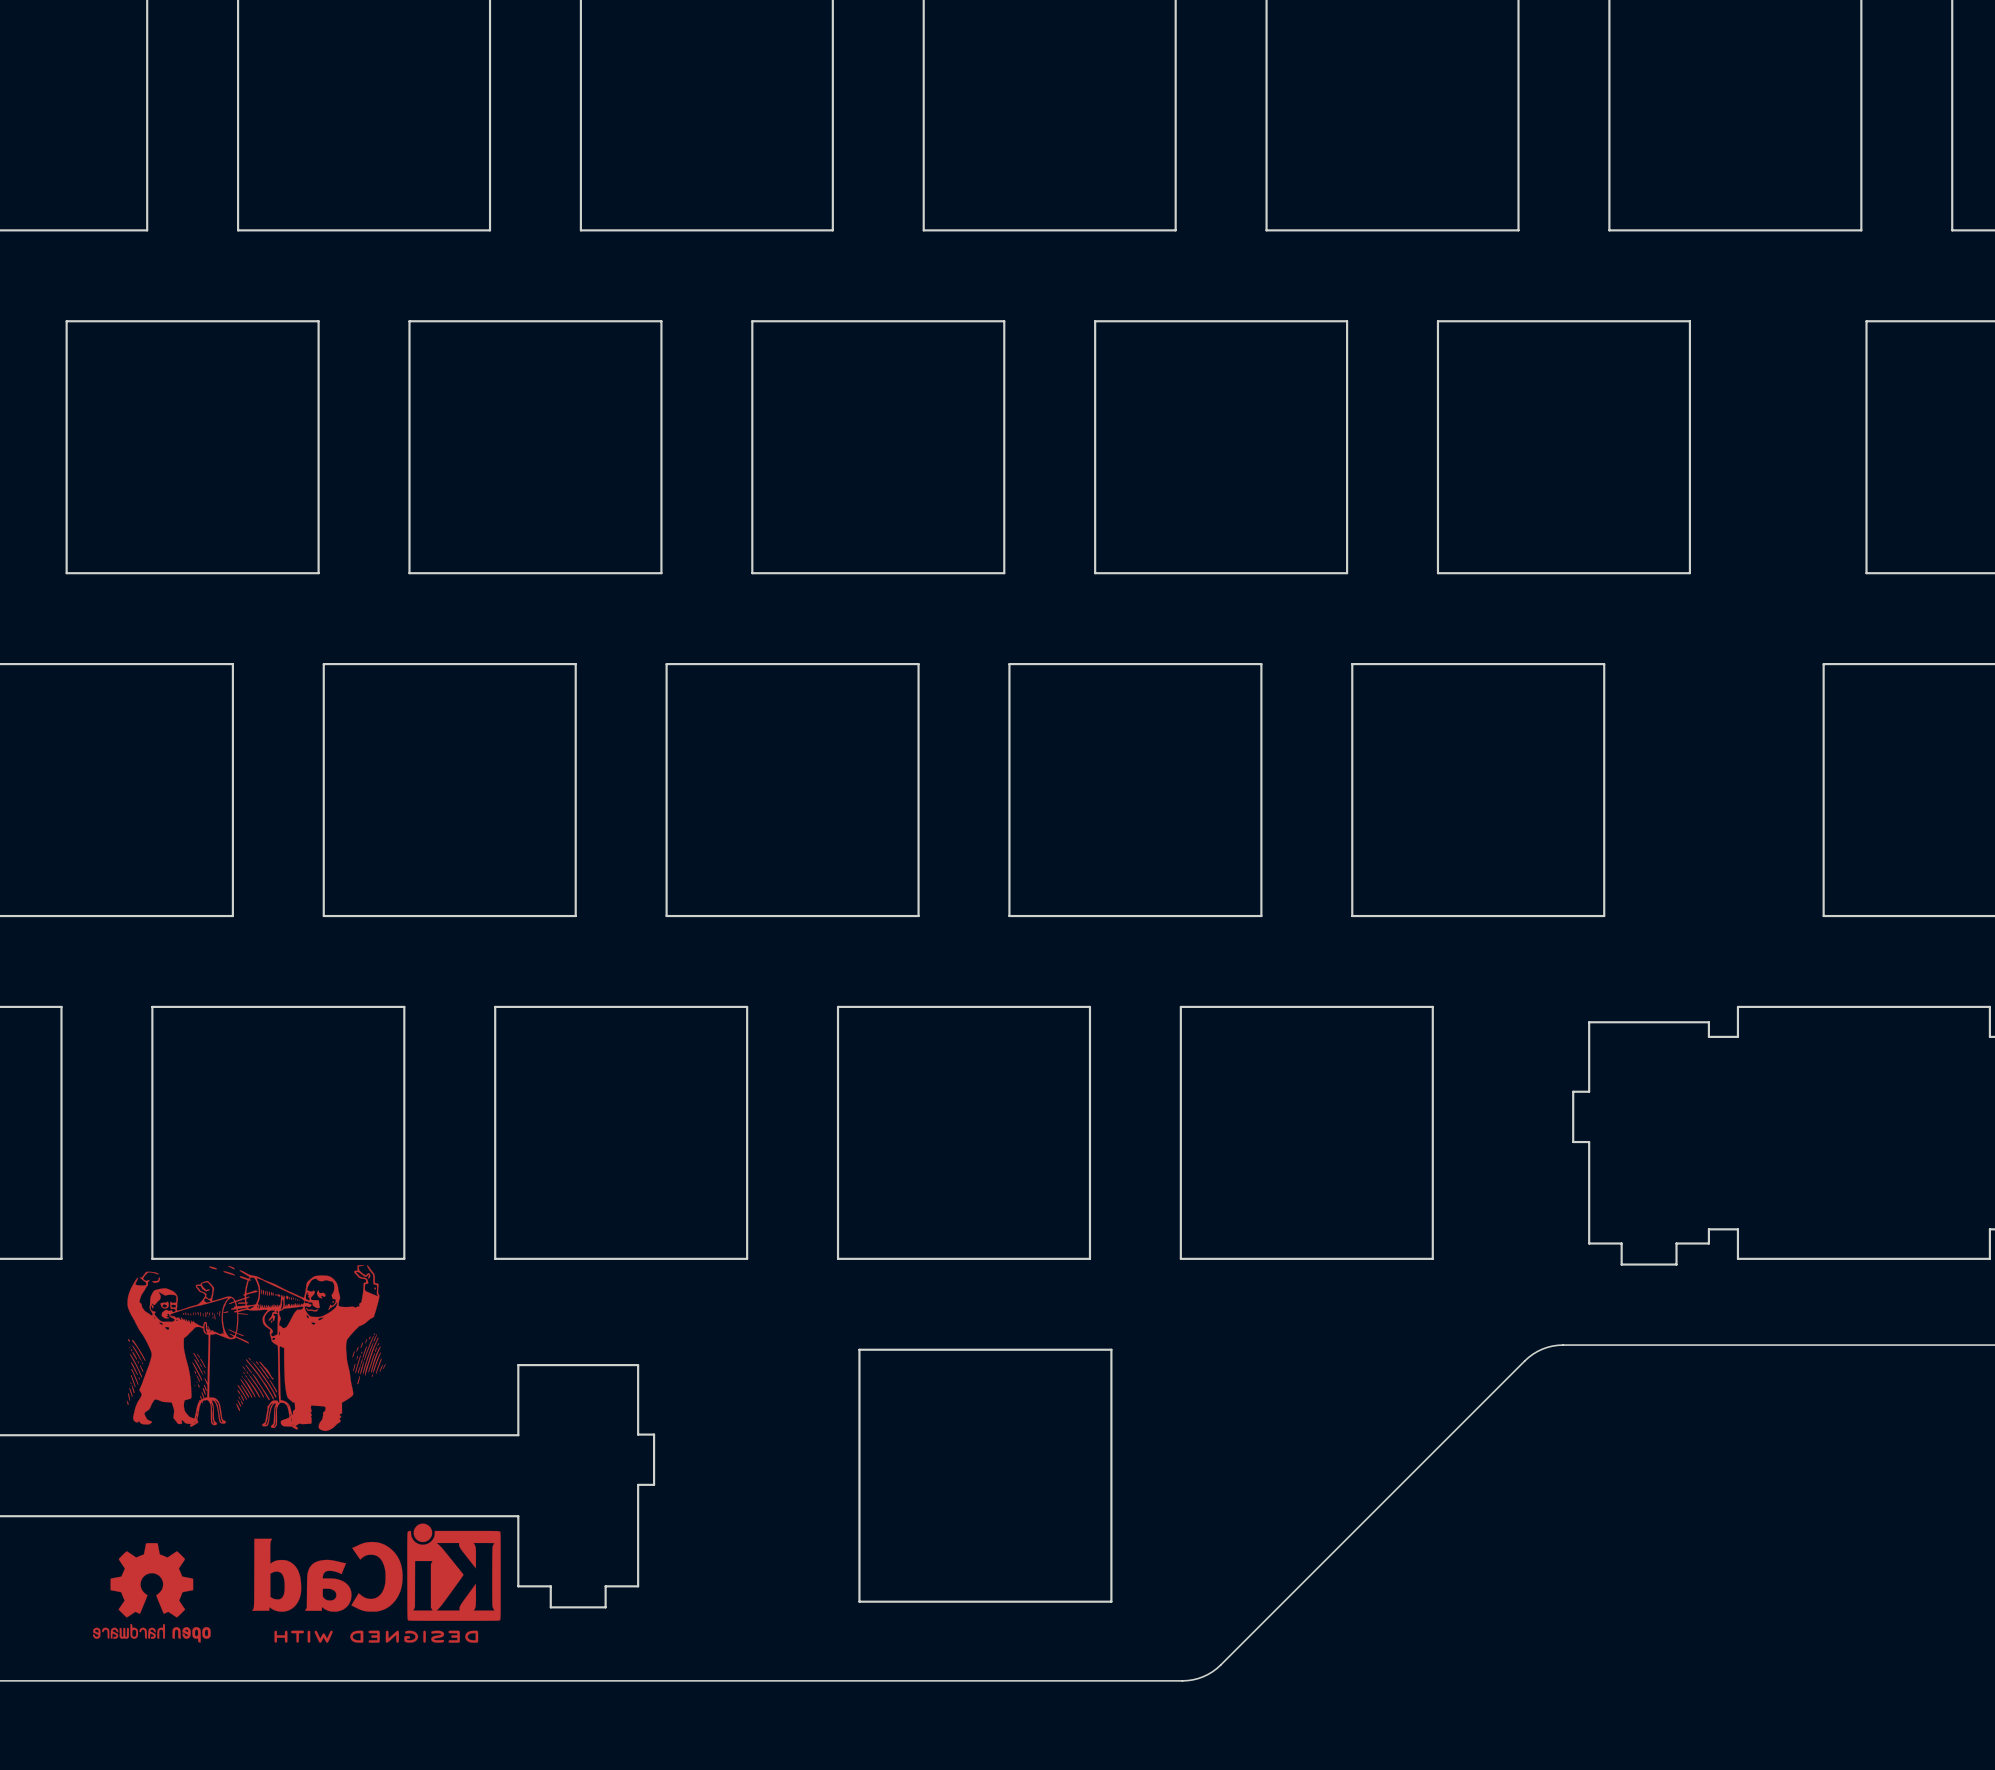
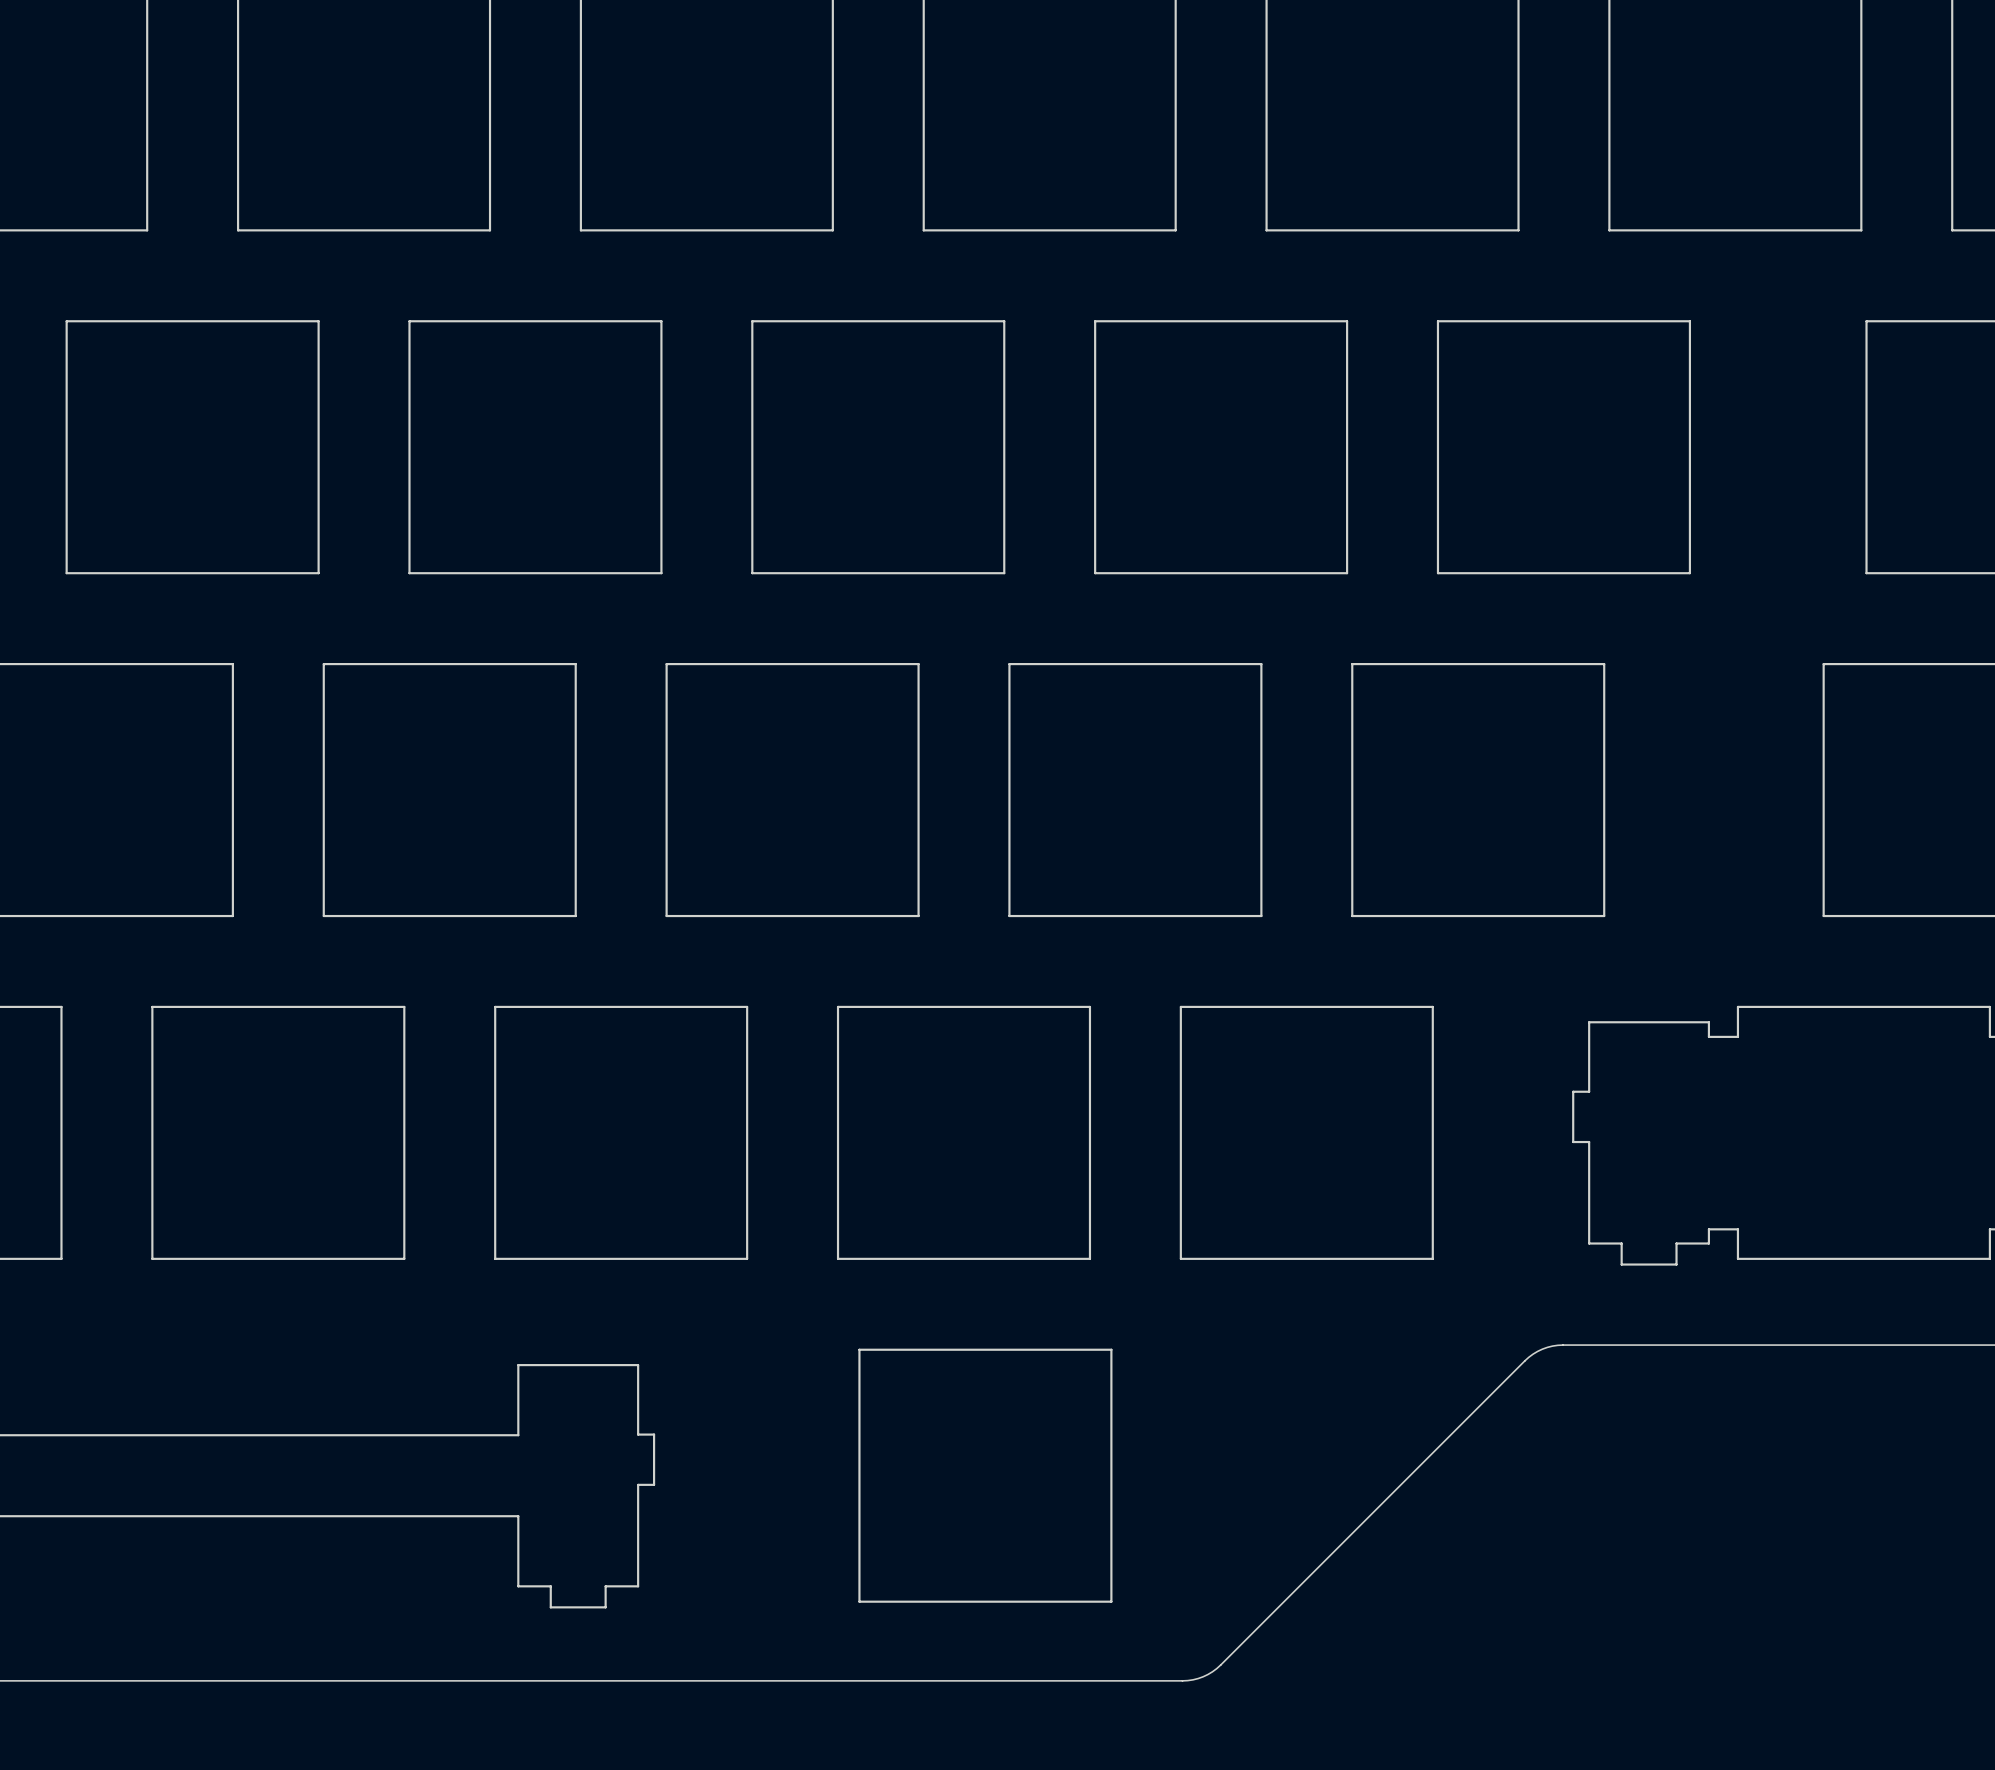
drawing: [127, 1265, 386, 1432] -> none
drawing: [252, 1523, 501, 1643] -> none
drawing: [93, 1543, 211, 1643] -> none

